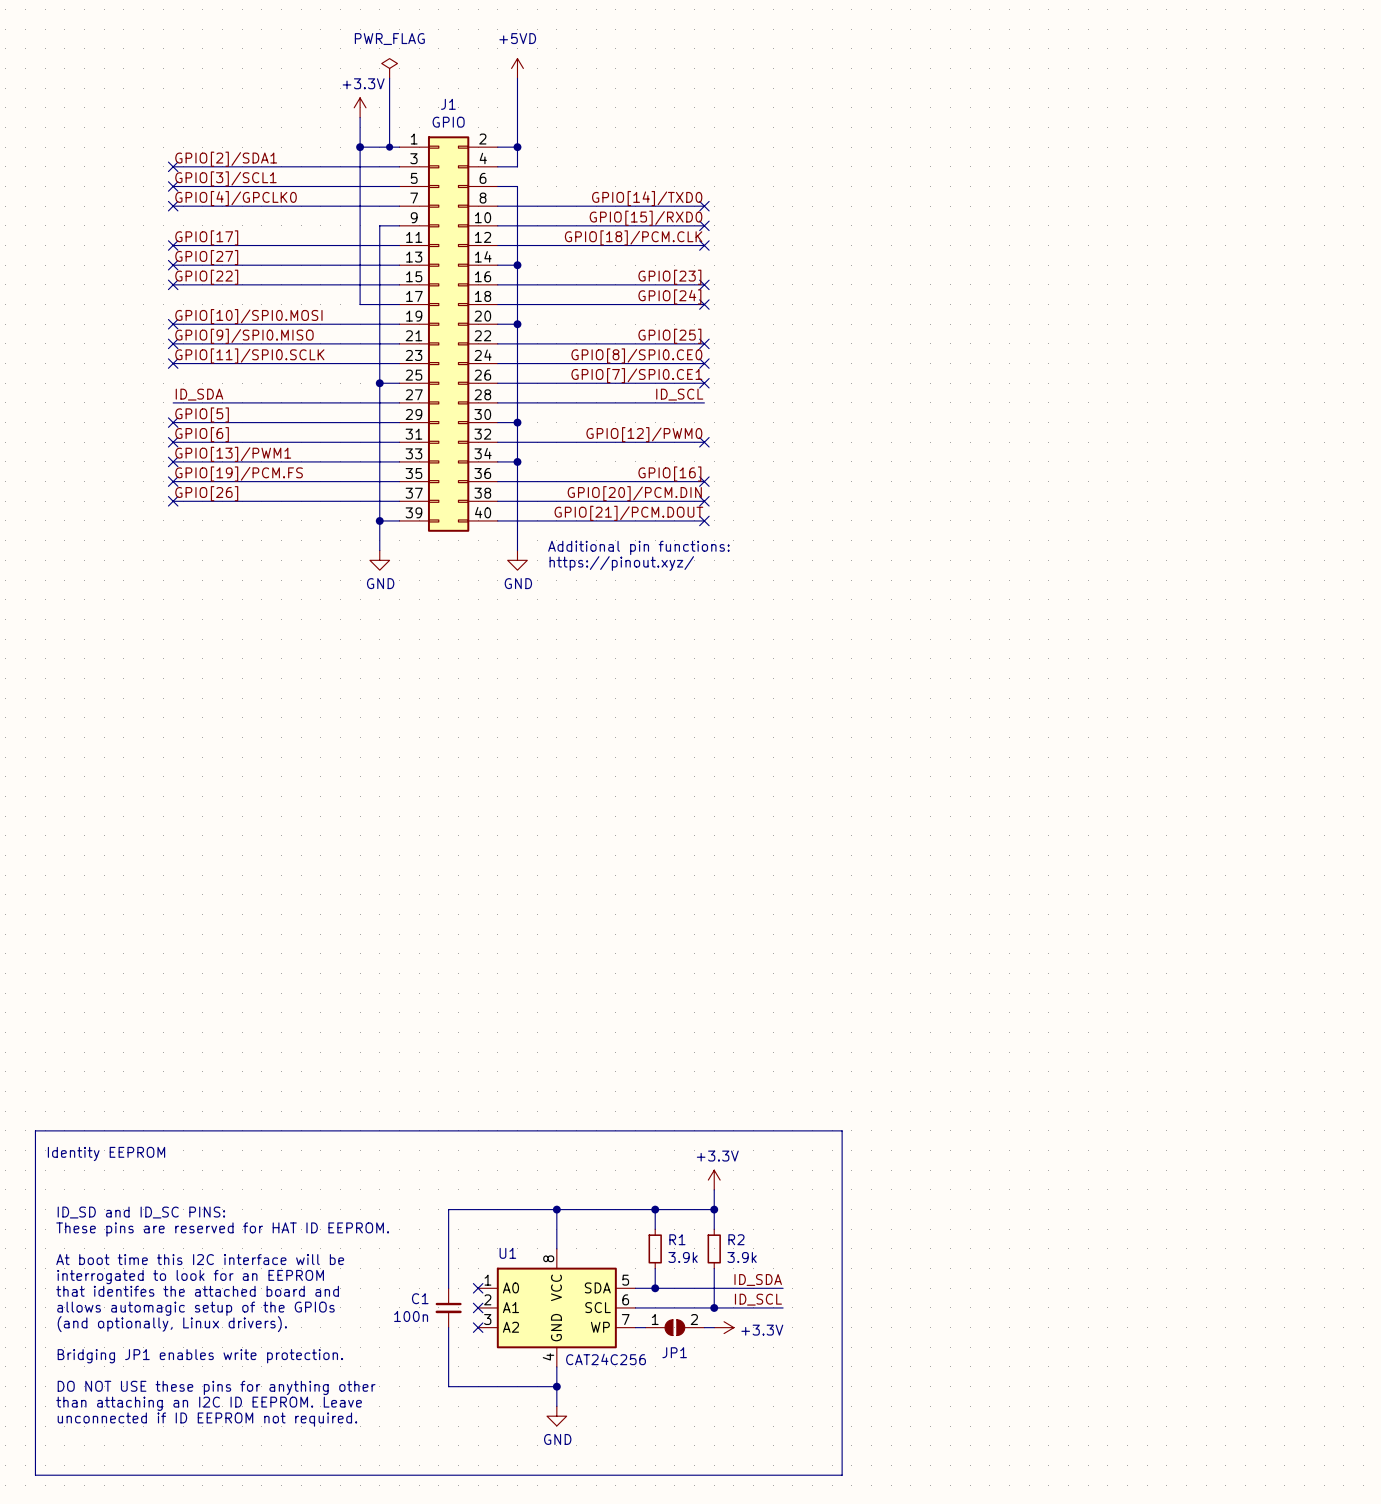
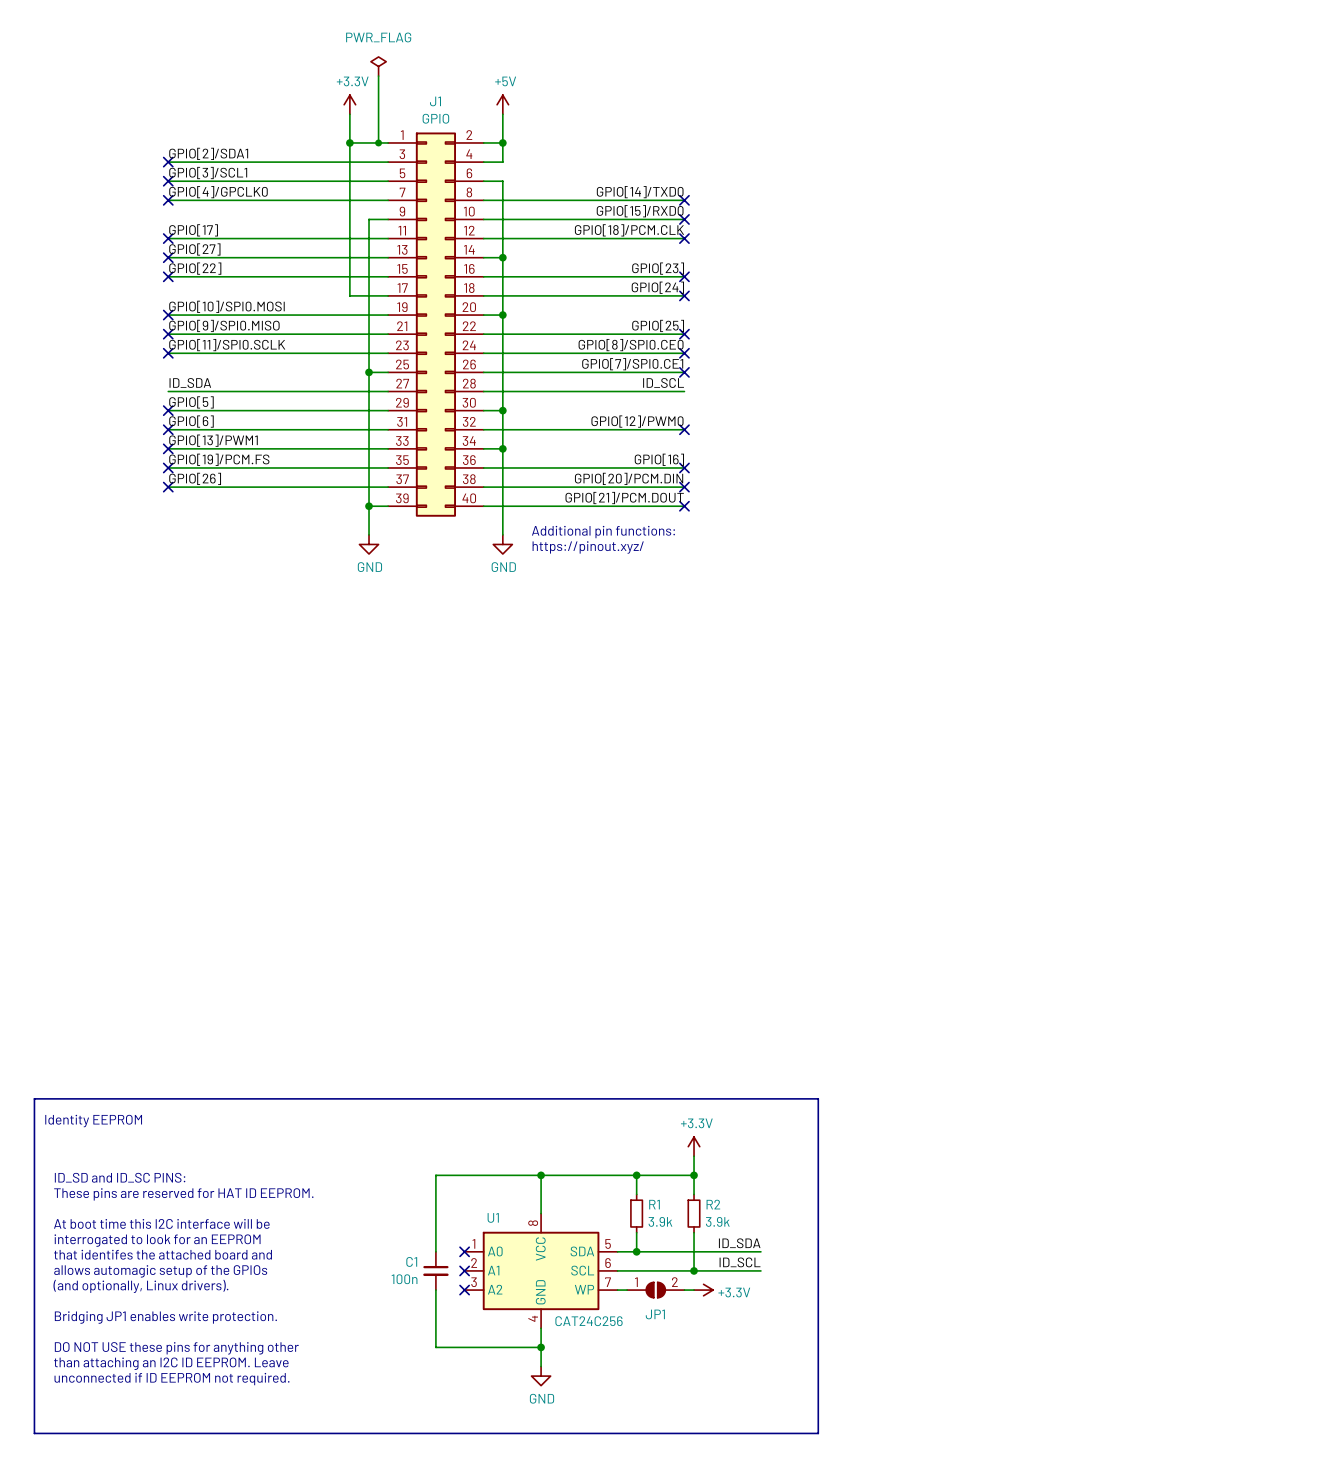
power symbol: +5VD (517, 68) -> none
wire: (517, 78) (517, 117) -> none
power symbol: none -> +5V (502, 104)

